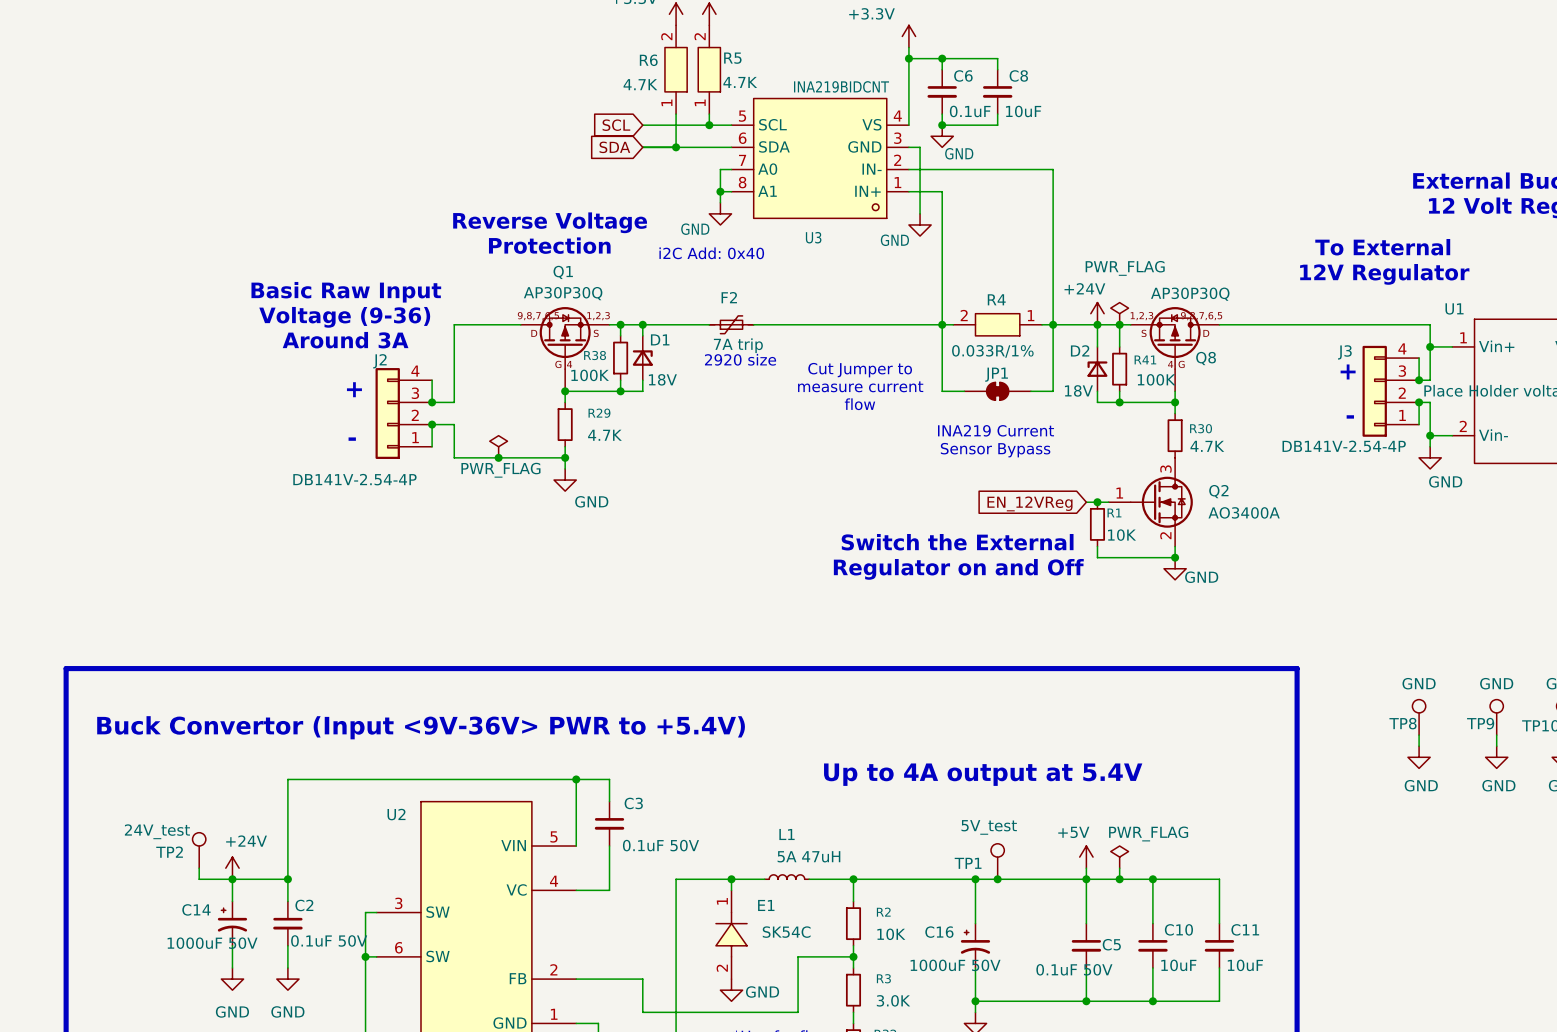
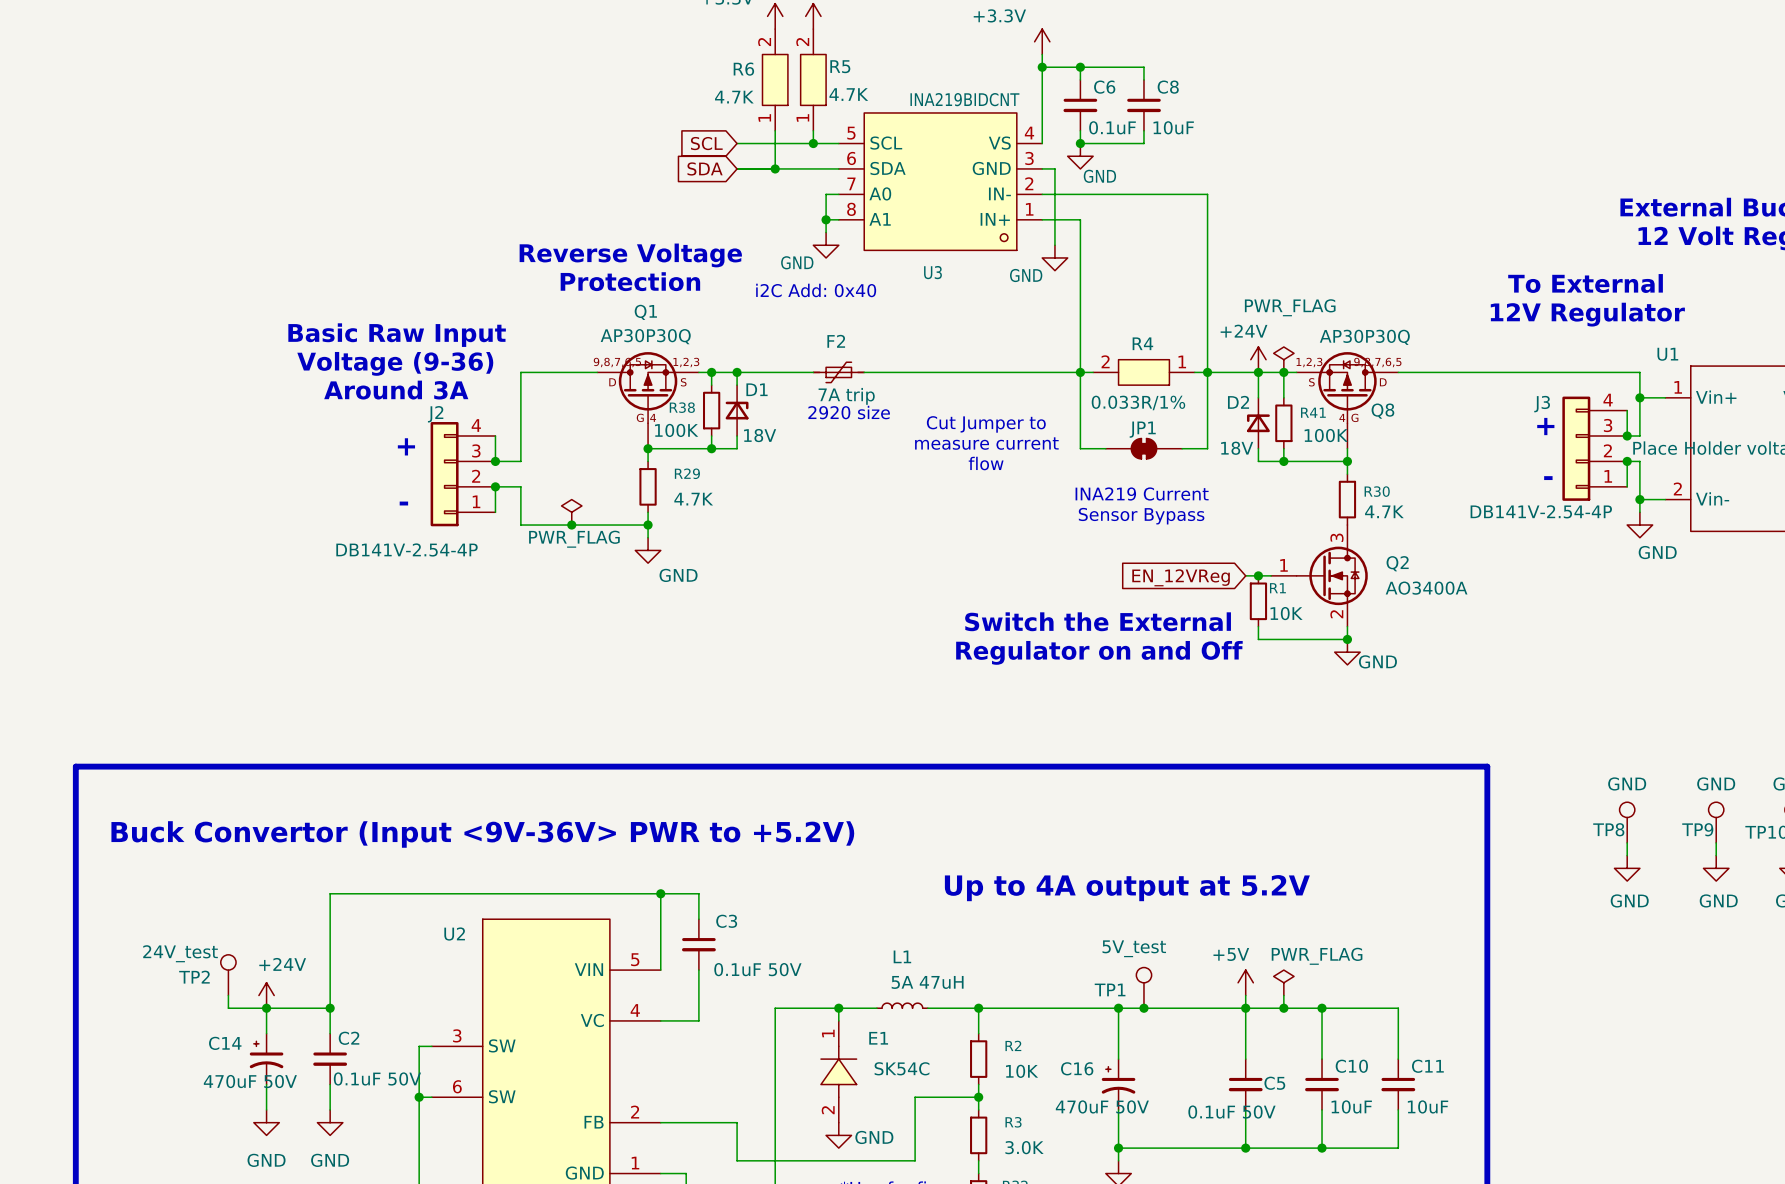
text: Buck Convertor (Input <9V-36V> PWR to +5.4V) (421, 727) -> Buck Convertor (Input <9V-36V> PWR to +5.2V) (482, 834)
text: Up to 4A output at 5.4V (983, 774) -> Up to 4A output at 5.2V (1127, 888)
C14 value: 1000uF 50V (212, 943) -> 470uF 50V (250, 1081)
C16 value: 1000uF 50V (955, 965) -> 470uF 50V (1102, 1106)

